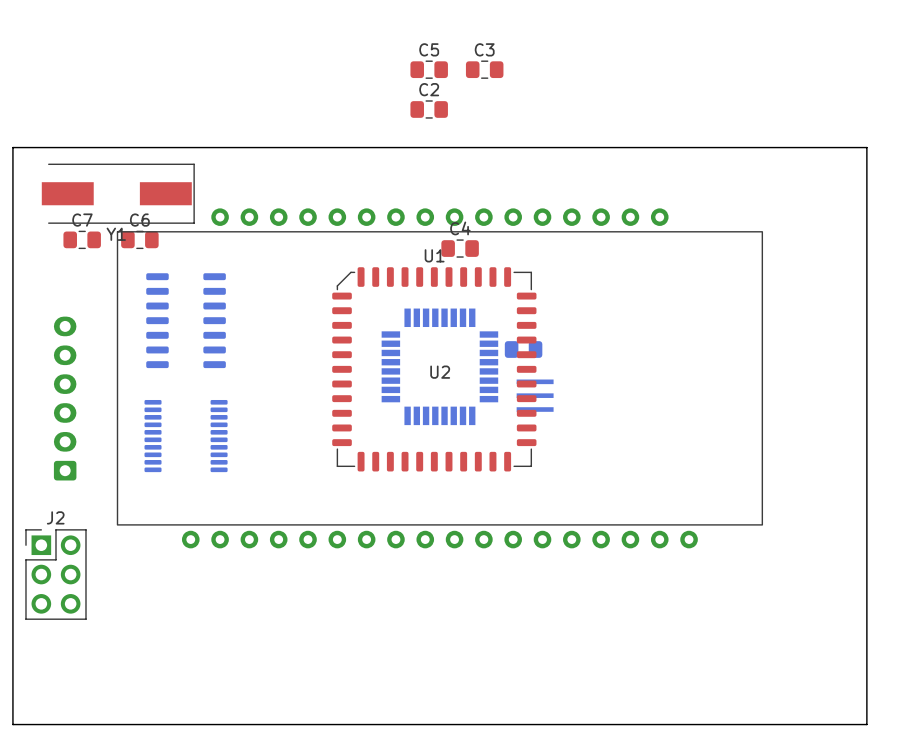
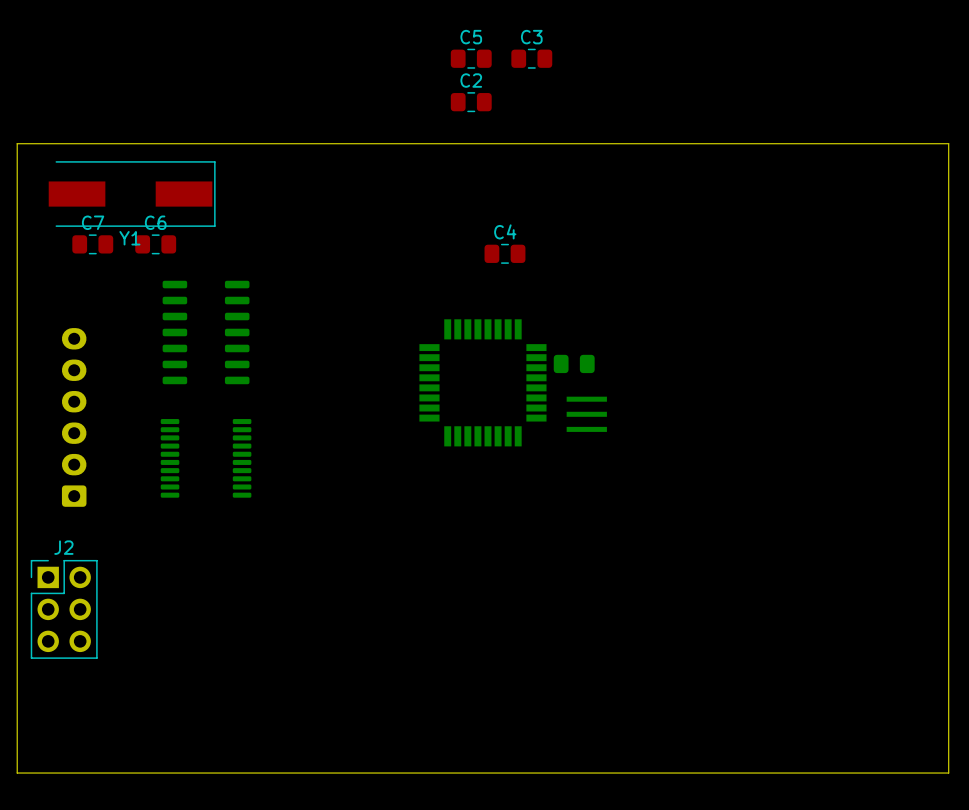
U1: (434, 369) -> none
U2: (439, 378) -> none

